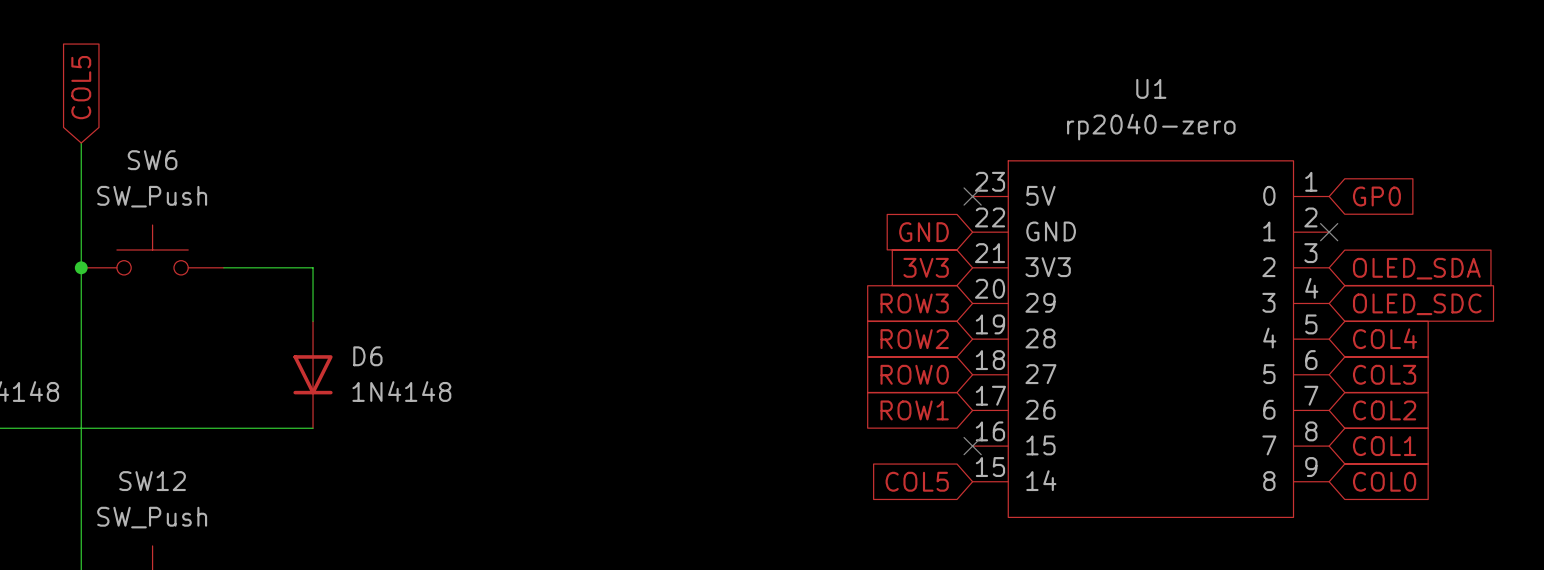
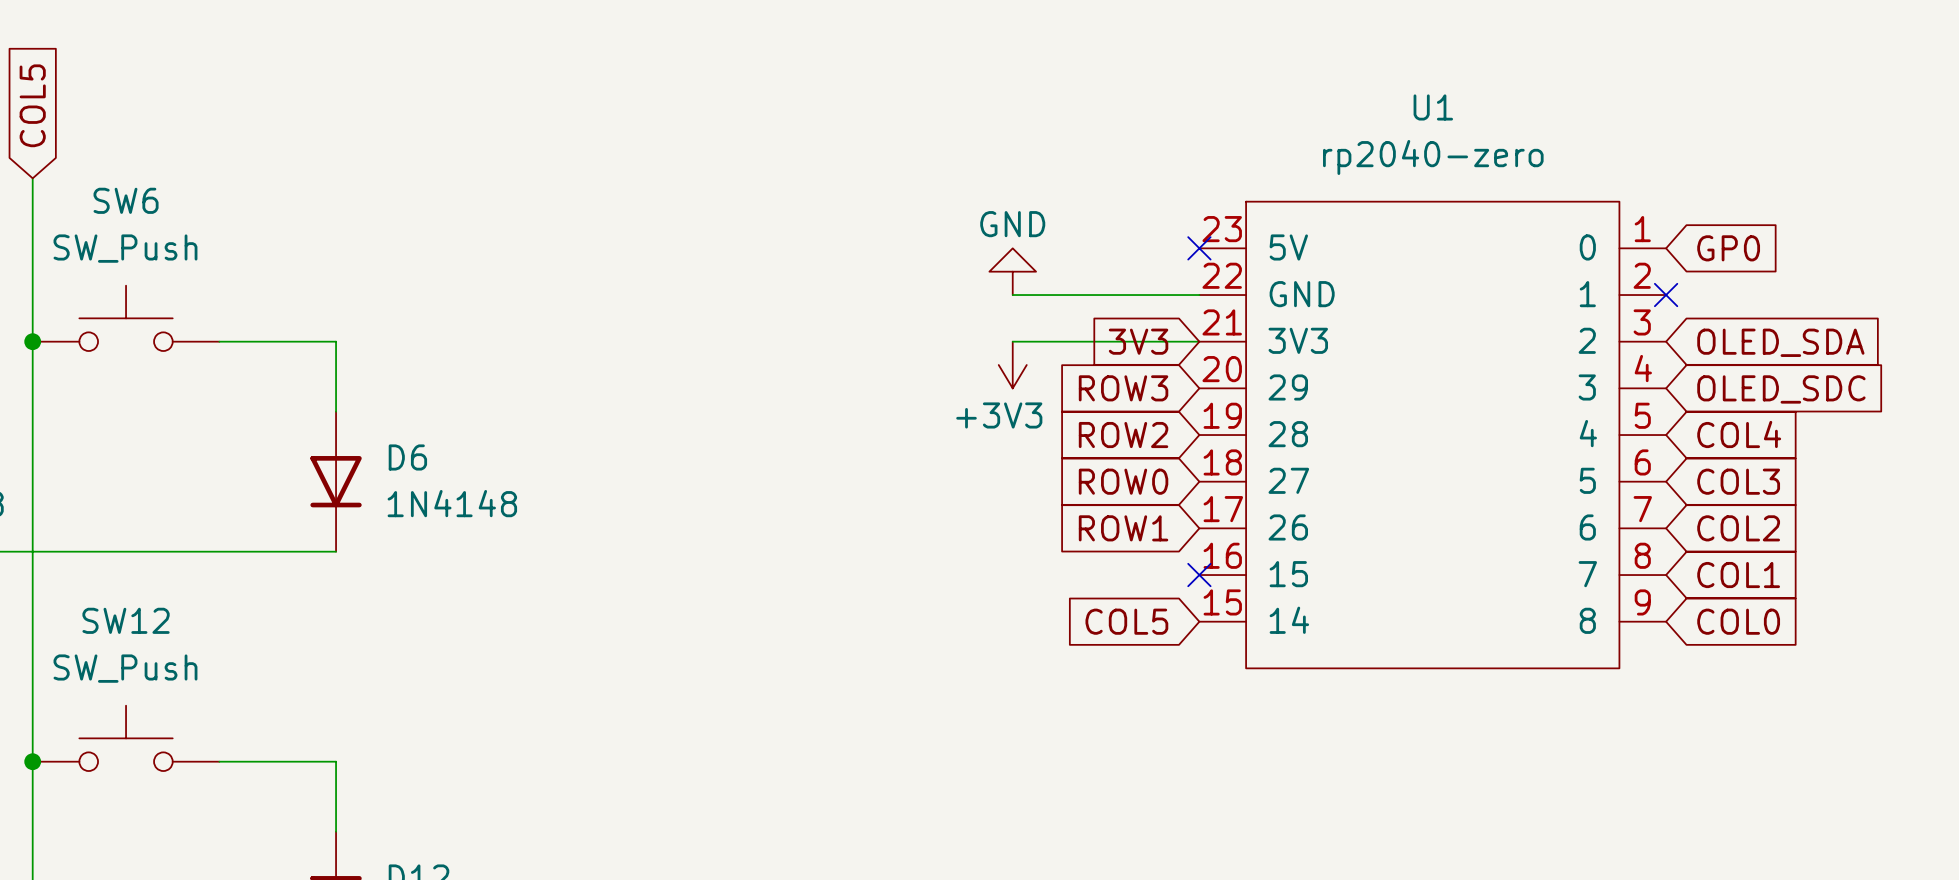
power symbol: none -> GND (1012, 271)
wire: none -> (1012, 295) (1199, 295)
global label: GND (923, 232) -> none
wire: none -> (1012, 341) (1199, 341)
power symbol: none -> +3V3 (1012, 365)

